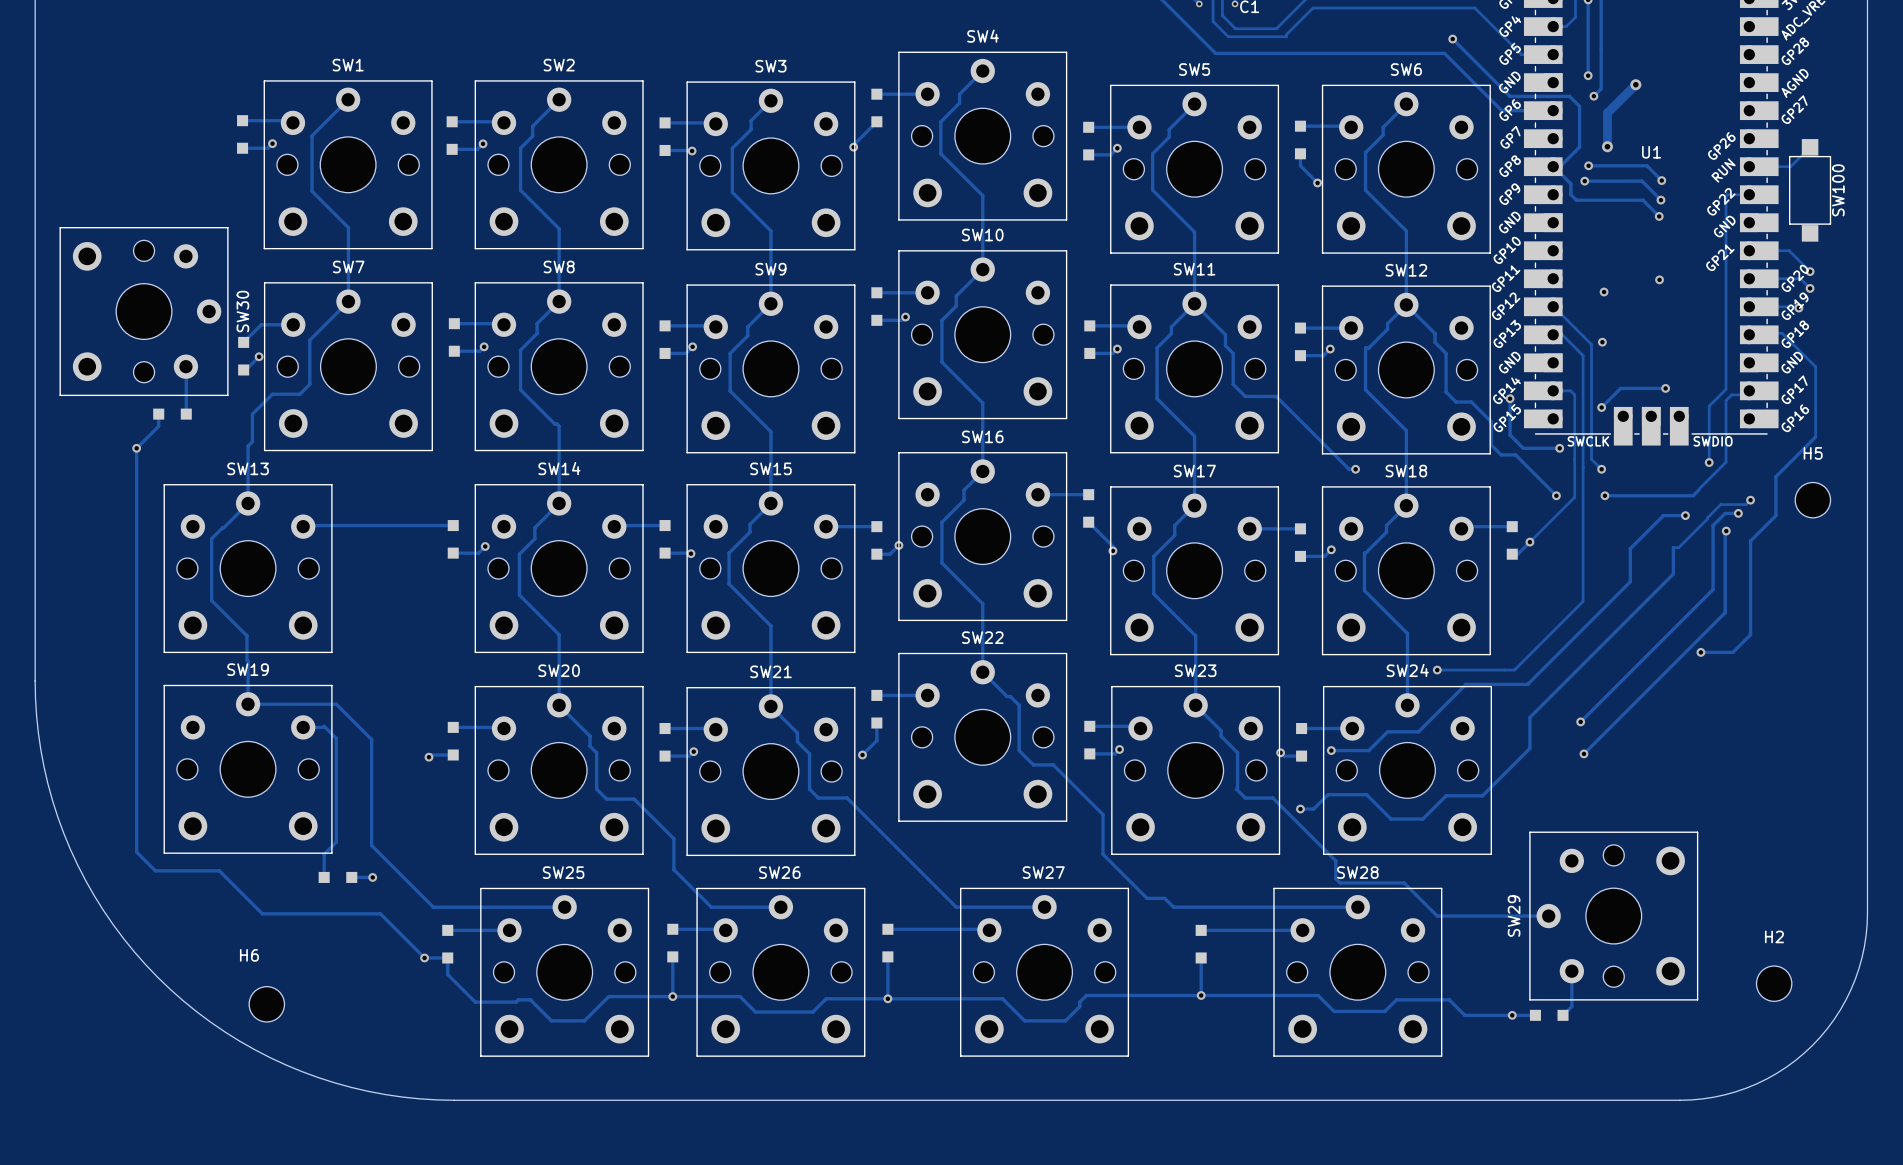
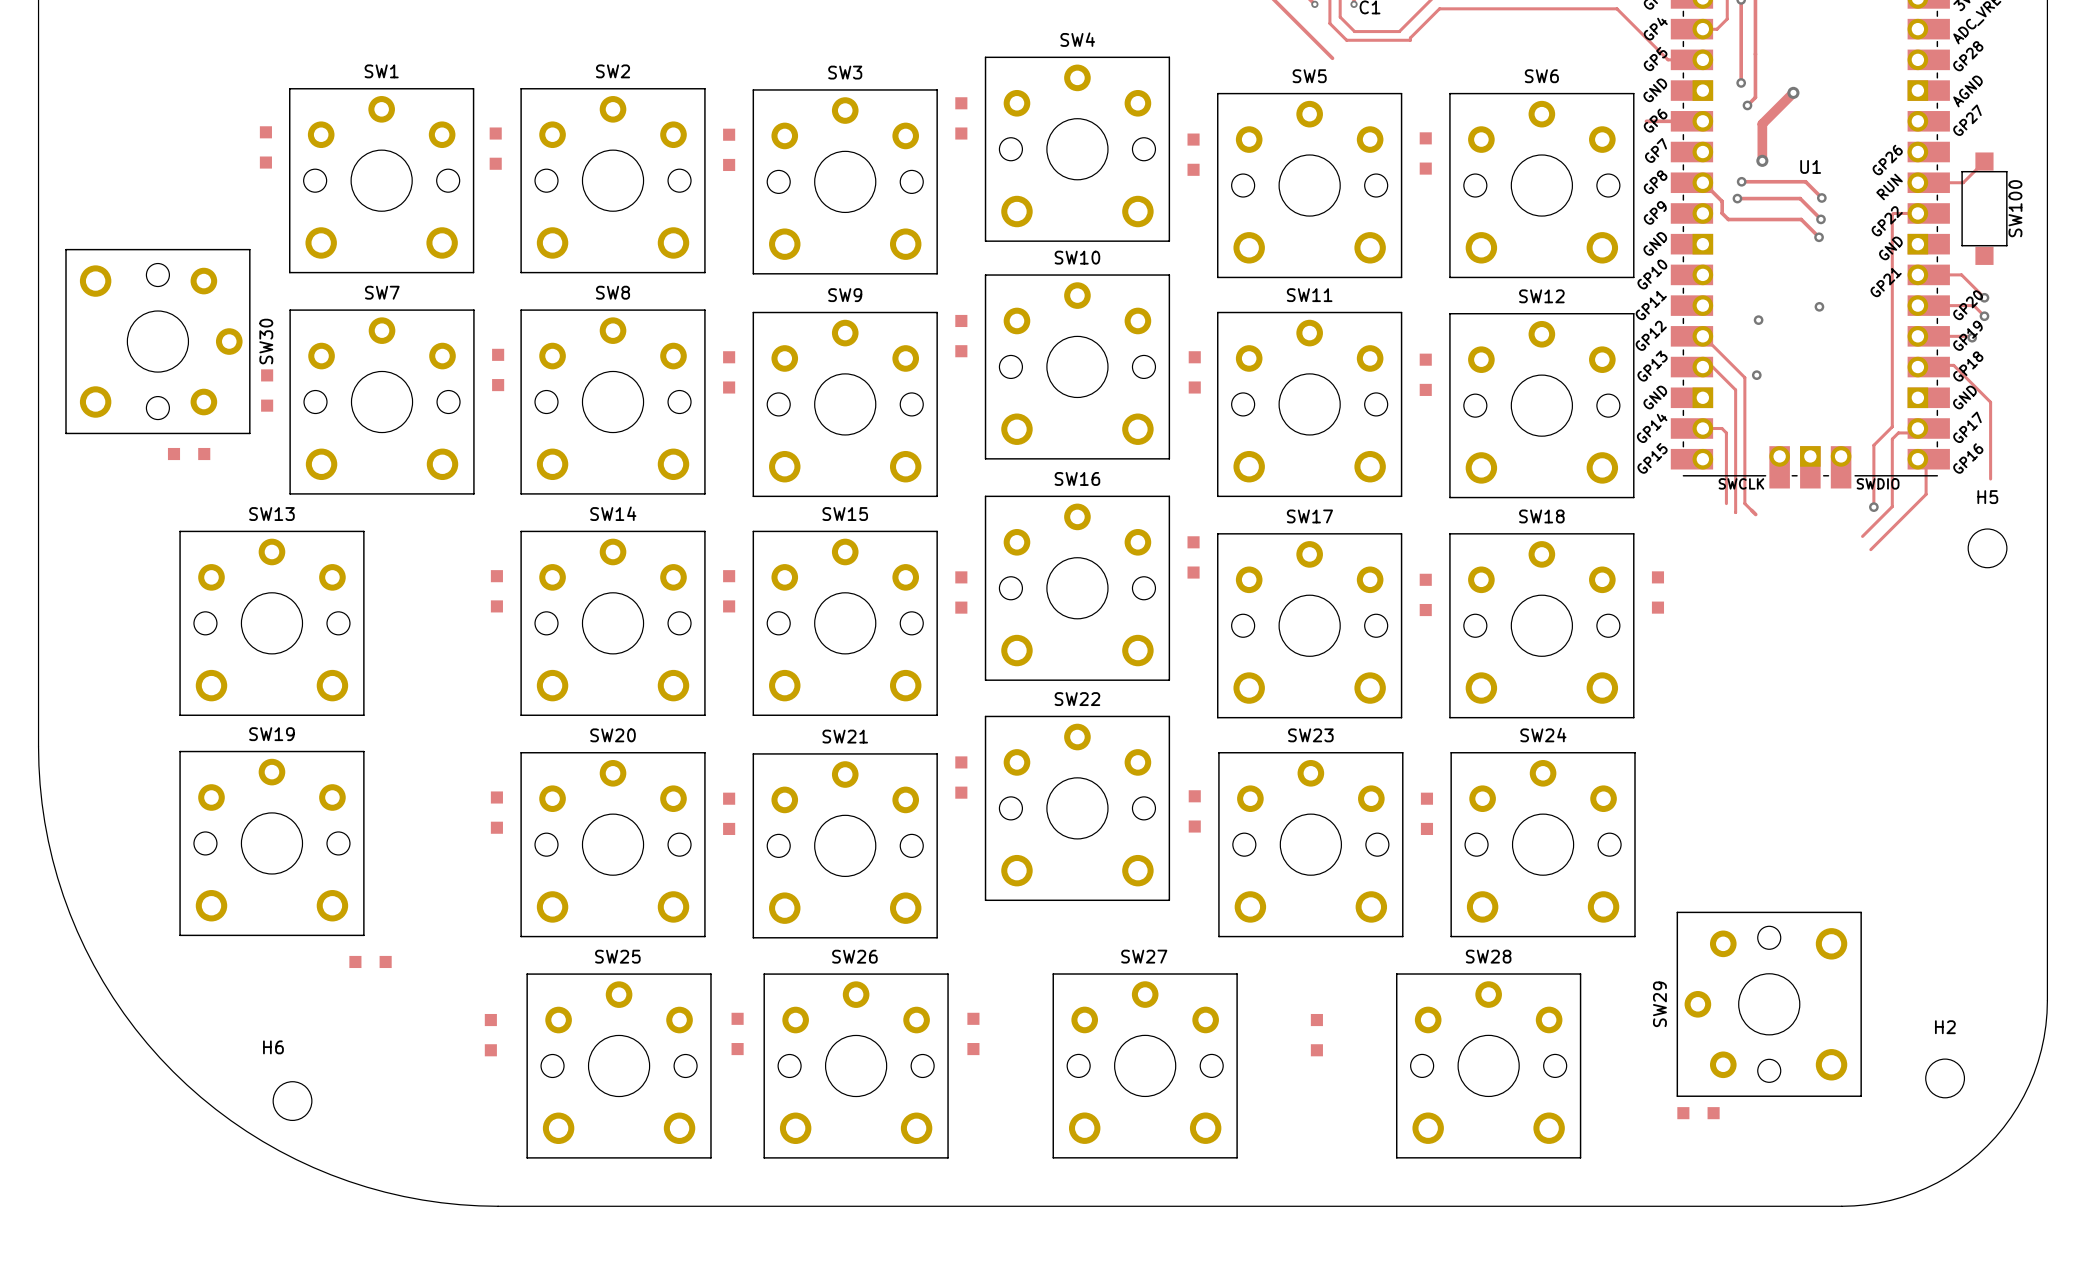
track: (1452, 39) (1510, 96) (1569, 96) (1579, 106) (1579, 147) (1560, 166) (1553, 166) -> none
via: (1452, 39) -> none
track: (1215, 53) (1444, 53) (1501, 110) -> none
track: (982, 71) (959, 94) (959, 103) (940, 121) (940, 153) (982, 195) (982, 269) (956, 296) (956, 306) (941, 320) (941, 362) (982, 403) (982, 471) (964, 490) (964, 500) (941, 522) (941, 563) (982, 603) (982, 672) (1007, 696) (1010, 696) (1019, 705) (1019, 750) (1033, 764) (1053, 764) (1103, 814) (1103, 854) (1147, 898) (1164, 898) (1173, 907) (1357, 907) -> none
track: (876, 94) (927, 94) -> none
track: (348, 99) (312, 135) (312, 191) (348, 227) (348, 301) (309, 340) (309, 384) (299, 394) (272, 394) (252, 414) (252, 441) (248, 446) (248, 503) (211, 538) (211, 600) (246, 635) (248, 704) (336, 704) (371, 739) (371, 845) (433, 907) (564, 907) -> none
track: (559, 99) (532, 126) (532, 136) (520, 148) (520, 190) (559, 228) (559, 301) (537, 323) (537, 333) (520, 350) (520, 389) (559, 426) (559, 503) (534, 527) (534, 538) (519, 554) (519, 595) (559, 634) (559, 705) (590, 736) (590, 746) (596, 752) (596, 789) (606, 799) (634, 799) (673, 838) (673, 869) (711, 907) (780, 907) -> none
track: (770, 100) (751, 120) (751, 129) (732, 148) (732, 192) (770, 230) (770, 303) (747, 326) (747, 335) (730, 353) (730, 390) (770, 431) (770, 503) (750, 524) (750, 532) (729, 553) (729, 584) (770, 625) (770, 706) (797, 732) (797, 741) (809, 753) (809, 789) (818, 798) (847, 798) (956, 907) (1044, 907) -> none
track: (1194, 104) (1169, 129) (1169, 137) (1152, 153) (1152, 190) (1194, 232) (1194, 303) -> none
track: (1406, 104) (1383, 127) (1383, 135) (1365, 152) (1365, 190) (1406, 230) (1406, 304) -> none
track: (242, 120) (290, 120) (292, 122) -> none
track: (452, 121) (503, 122) -> none
track: (876, 121) (853, 147) -> none
track: (665, 122) (715, 123) -> none
track: (1300, 126) (1351, 127) -> none
track: (1088, 127) (1139, 127) -> none
track: (272, 143) (267, 148) (242, 148) -> none
via: (272, 143) -> none
track: (483, 143) (477, 149) (452, 149) -> none
via: (483, 143) -> none
via: (853, 147) -> none
track: (1117, 148) (1110, 154) (1088, 154) -> none
via: (1117, 148) -> none
track: (665, 150) (692, 151) -> none
via: (692, 151) -> none
track: (1300, 153) (1300, 165) (1317, 183) -> none
via: (1317, 183) -> none
track: (876, 292) (927, 292) -> none
track: (1194, 303) (1171, 326) (1171, 333) (1157, 347) (1157, 398) (1194, 436) (1194, 505) (1174, 525) (1174, 535) (1153, 556) (1153, 593) (1195, 635) (1195, 705) (1221, 730) (1221, 736) (1237, 752) (1236, 789) (1245, 798) (1272, 798) (1335, 860) (1335, 878) (1340, 882) (1404, 882) (1437, 916) (1548, 916) -> none
track: (1194, 303) (1225, 334) (1225, 345) (1233, 353) (1233, 384) (1245, 396) (1276, 396) (1349, 469) (1355, 469) -> none
track: (1406, 304) (1435, 333) (1435, 342) (1446, 353) (1446, 392) (1456, 401) (1471, 401) (1491, 421) (1491, 445) (1501, 454) (1515, 454) (1556, 495) -> none
track: (1406, 304) (1387, 323) (1387, 329) (1368, 347) (1365, 347) (1365, 389) (1406, 430) (1406, 505) (1386, 525) (1386, 532) (1364, 553) (1364, 590) (1407, 633) (1407, 705) -> none
track: (905, 317) (902, 320) (876, 320) -> none
via: (905, 317) -> none
track: (454, 323) (503, 324) -> none
track: (293, 324) (261, 324) (243, 342) -> none
track: (665, 325) (715, 326) -> none
track: (1089, 325) (1139, 326) -> none
track: (1300, 328) (1351, 328) -> none
track: (484, 346) (479, 351) (454, 351) -> none
via: (484, 346) -> none
track: (692, 346) (686, 353) (665, 353) -> none
via: (692, 346) -> none
track: (1117, 349) (1112, 353) (1089, 353) -> none
via: (1117, 349) -> none
track: (1330, 349) (1323, 355) (1300, 355) -> none
via: (1330, 349) -> none
track: (259, 356) (243, 369) -> none
via: (259, 356) -> none
track: (185, 366) (186, 414) -> none
track: (1665, 388) (1620, 388) (1601, 407) -> none
via: (1665, 388) -> none
track: (1510, 398) (1510, 435) (1523, 448) (1559, 448) -> none
via: (1510, 398) -> none
via: (1601, 407) -> none
track: (158, 414) (158, 426) (136, 448) (136, 852) (155, 870) (219, 870) (262, 913) (380, 913) (424, 957) (447, 957) (447, 974) (475, 1002) (516, 1002) (518, 999) (530, 999) (551, 1020) (584, 1020) (608, 996) (740, 996) (755, 1012) (812, 1012) (826, 998) (1002, 998) (1024, 1020) (1065, 1020) (1079, 1006) (1079, 1002) (1086, 995) (1318, 995) (1334, 1011) (1384, 1011) (1396, 999) (1449, 999) (1464, 1015) (1535, 1015) -> none
track: none -> (1917, 459) (1926, 467) (1926, 494) (1870, 549)
track: (1815, 436) (1775, 476) (1775, 515) (1750, 540) (1750, 634) (1732, 652) (1700, 652) -> none
via: (136, 448) -> none
via: (1559, 448) -> none
track: (1574, 459) (1574, 497) (1517, 554) (1512, 554) -> none
track: (1583, 467) (1583, 601) (1514, 670) (1437, 670) -> none
via: (1355, 469) -> none
via: (1601, 469) -> none
track: (1698, 490) (1693, 495) (1604, 495) -> none
track: (1037, 494) (1088, 494) -> none
via: (1556, 495) -> none
via: (1604, 495) -> none
track: (1750, 500) (1746, 504) (1720, 504) (1678, 547) (1673, 547) (1673, 574) (1529, 717) (1529, 748) (1482, 795) (1446, 795) (1422, 818) (1390, 818) (1366, 794) (1328, 794) (1313, 809) (1300, 809) -> none
via: (1750, 500) -> none
track: (1738, 513) (1725, 513) (1713, 525) (1713, 589) (1580, 721) -> none
via: (1738, 513) -> none
track: (1685, 515) (1663, 515) (1630, 548) (1630, 581) (1527, 684) (1465, 684) (1418, 731) (1387, 731) (1368, 750) (1331, 750) -> none
via: (1685, 515) -> none
track: (1088, 522) (1112, 546) (1112, 550) -> none
track: (453, 525) (303, 526) -> none
track: (665, 525) (614, 526) -> none
track: (826, 526) (876, 526) -> none
track: (1512, 526) (1463, 526) (1461, 528) -> none
track: (1249, 528) (1300, 528) -> none
track: (1726, 531) (1725, 612) (1583, 753) -> none
via: (1726, 531) -> none
via: (1529, 542) -> none
track: (898, 545) (890, 554) (876, 554) -> none
via: (898, 545) -> none
track: (485, 546) (478, 553) (453, 553) -> none
via: (485, 546) -> none
track: (1331, 549) (1324, 556) (1300, 556) -> none
via: (1331, 549) -> none
via: (1112, 550) -> none
track: (665, 553) (690, 553) -> none
via: (690, 553) -> none
via: (1700, 652) -> none
via: (1437, 670) -> none
track: (876, 695) (927, 695) -> none
via: (1580, 721) -> none
track: (876, 723) (876, 740) (862, 754) -> none
track: (1089, 726) (1138, 726) (1140, 728) -> none
track: (303, 727) (324, 726) (336, 738) (336, 842) (324, 854) (324, 877) -> none
track: (453, 727) (503, 728) -> none
track: (665, 728) (715, 729) -> none
track: (1301, 728) (1352, 728) -> none
track: (1119, 749) (1115, 753) (1089, 753) -> none
via: (1119, 749) -> none
via: (1331, 750) -> none
track: (693, 751) (689, 756) (665, 756) -> none
via: (693, 751) -> none
track: (1280, 752) (1283, 756) (1301, 756) -> none
via: (1280, 752) -> none
via: (1583, 753) -> none
track: (453, 754) (431, 754) (428, 757) -> none
via: (862, 754) -> none
via: (428, 757) -> none
via: (1300, 809) -> none
track: (351, 877) (372, 877) -> none
via: (372, 877) -> none
track: (672, 929) (725, 930) -> none
track: (887, 929) (989, 930) -> none
track: (447, 930) (509, 930) -> none
track: (1201, 930) (1302, 930) -> none
track: (672, 956) (672, 996) -> none
track: (887, 956) (887, 996) (890, 998) -> none
via: (424, 957) -> none
track: (1201, 957) (1201, 995) -> none
track: (1571, 971) (1571, 1006) (1563, 1015) -> none
via: (1201, 995) -> none
via: (672, 996) -> none
via: (887, 998) -> none
via: (1512, 1015) -> none

